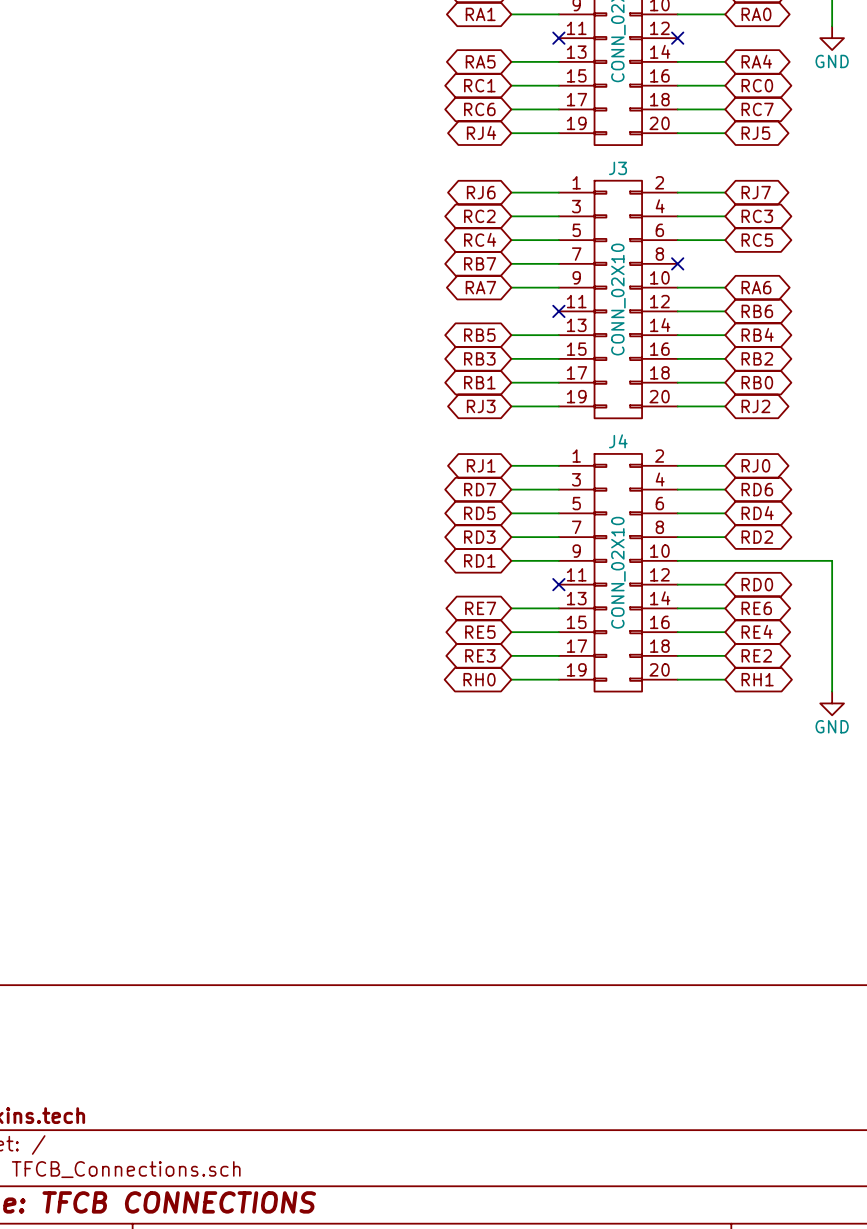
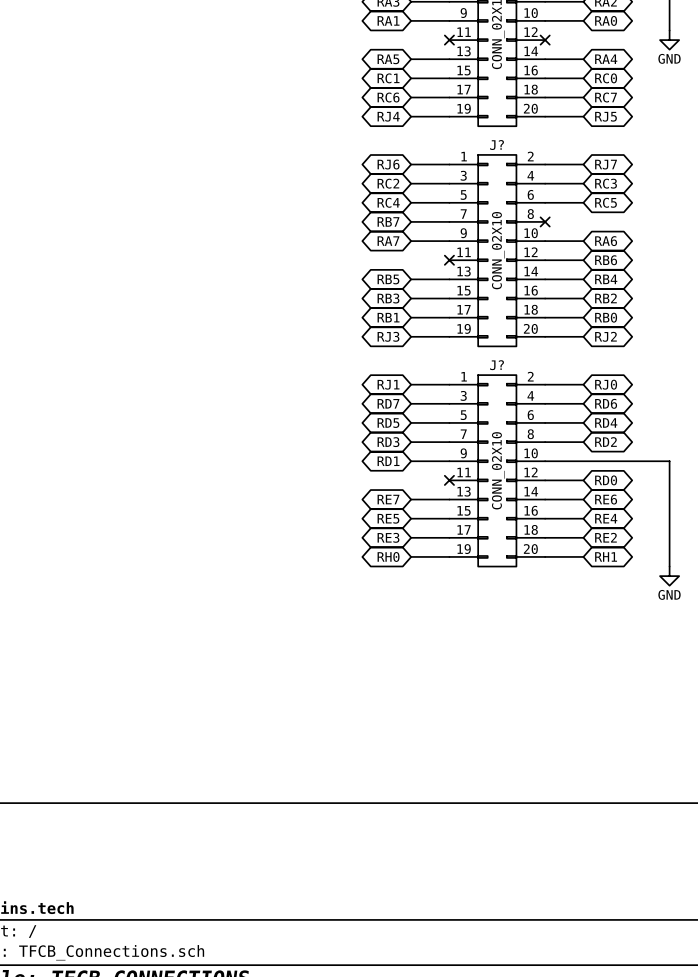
J3 name: J3 (618, 168) -> J? (497, 145)
J4 name: J4 (618, 441) -> J? (497, 365)

